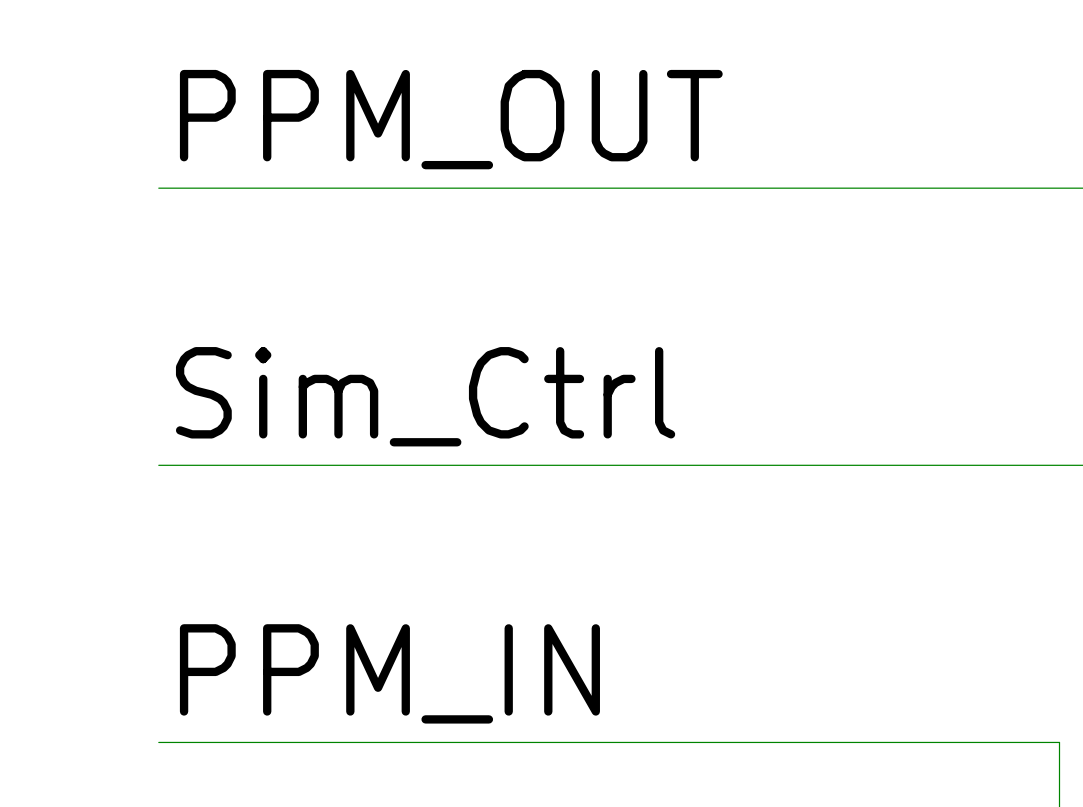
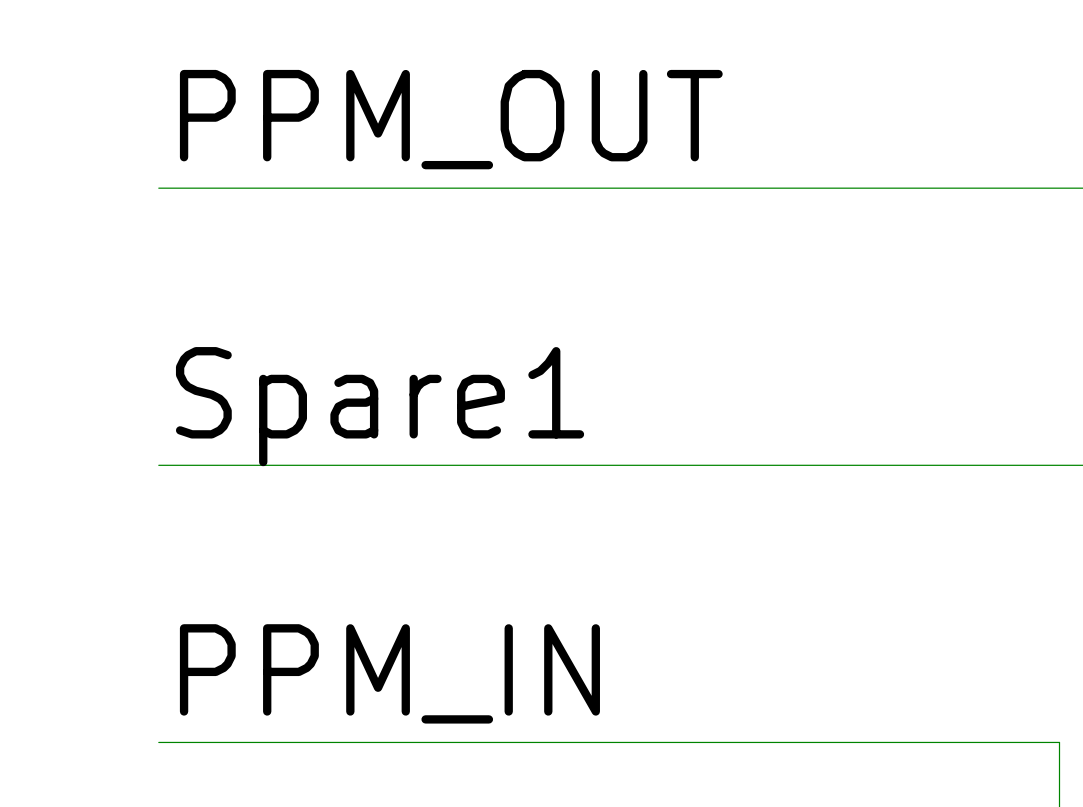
label: Sim_Ctrl (425, 396) -> Spare1 (380, 406)

